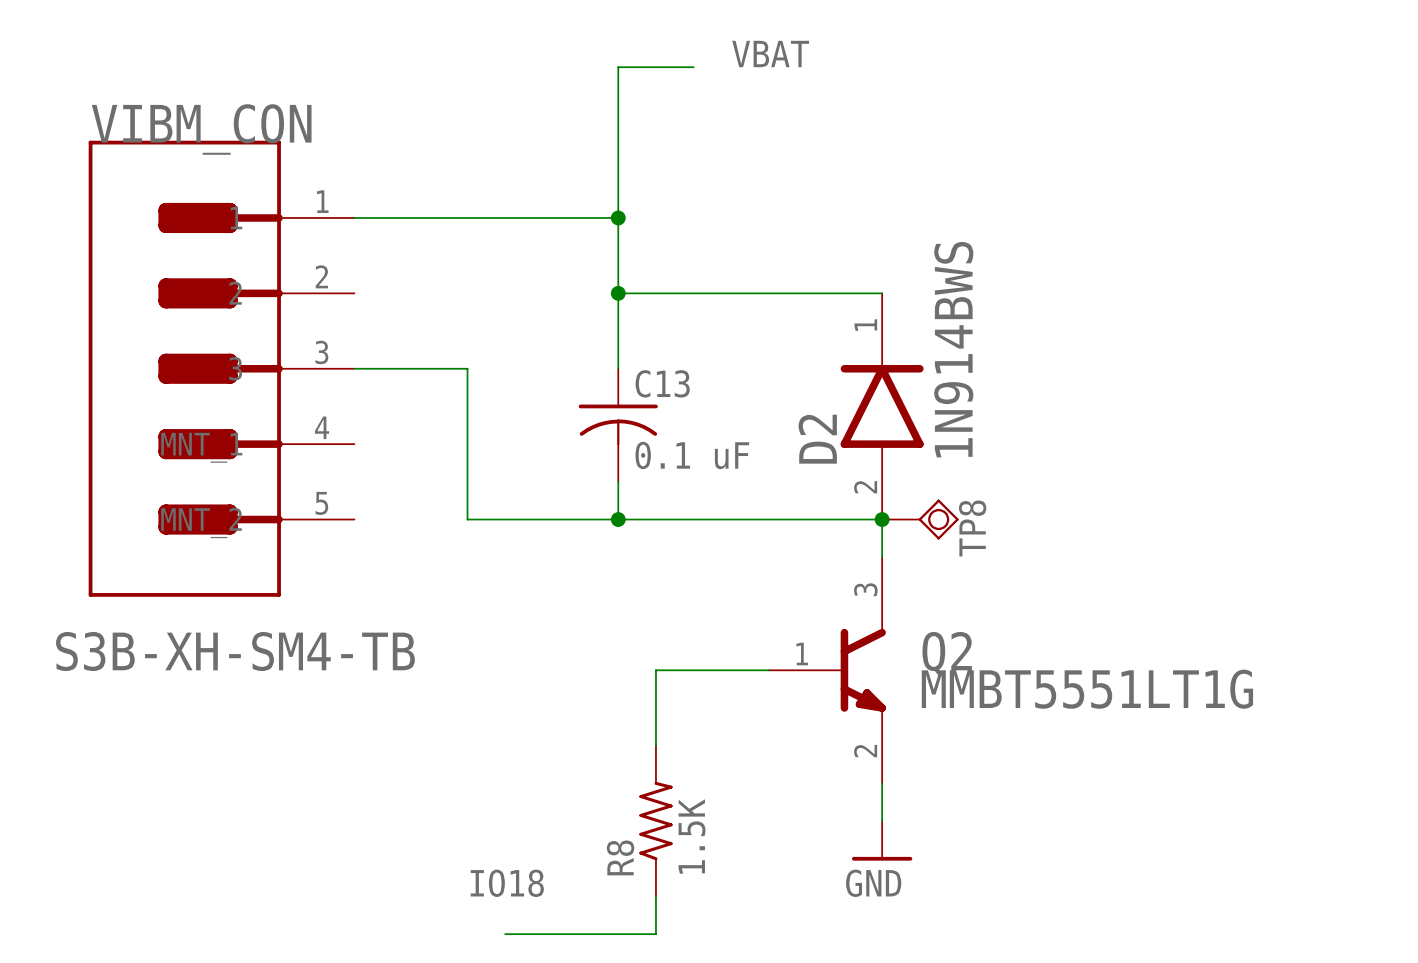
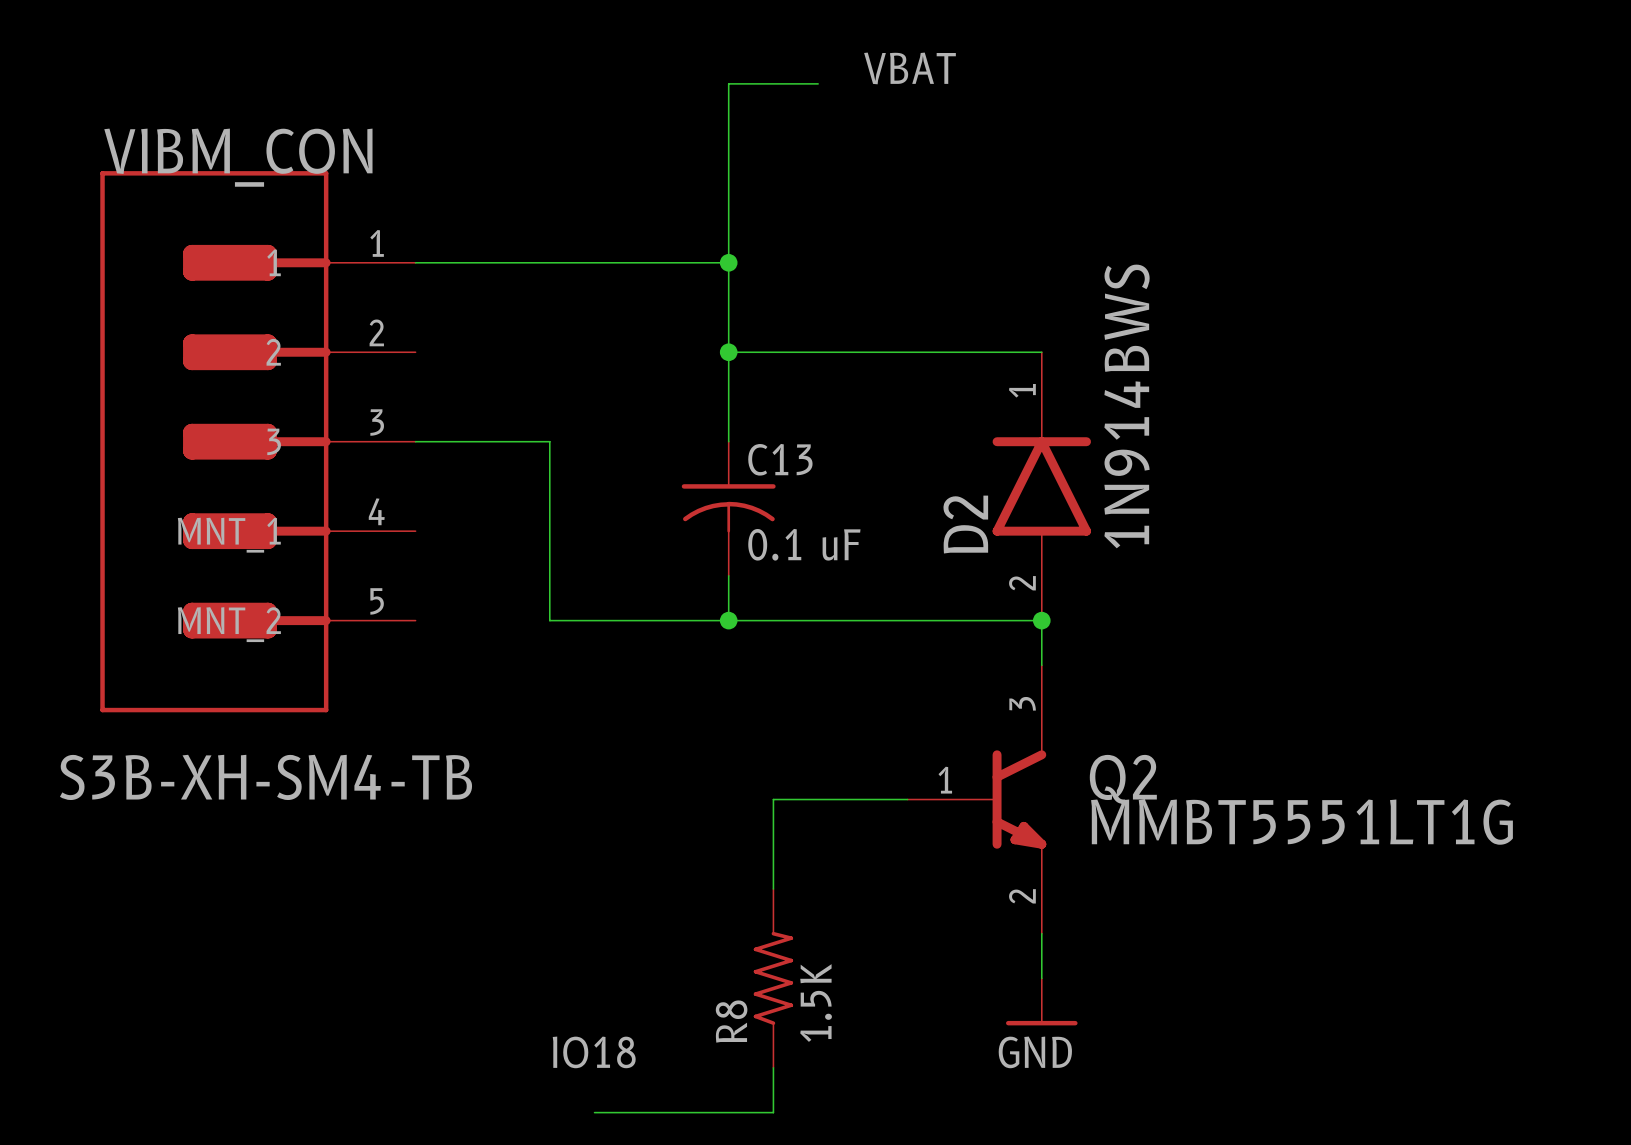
TP8: (920, 519) -> none

